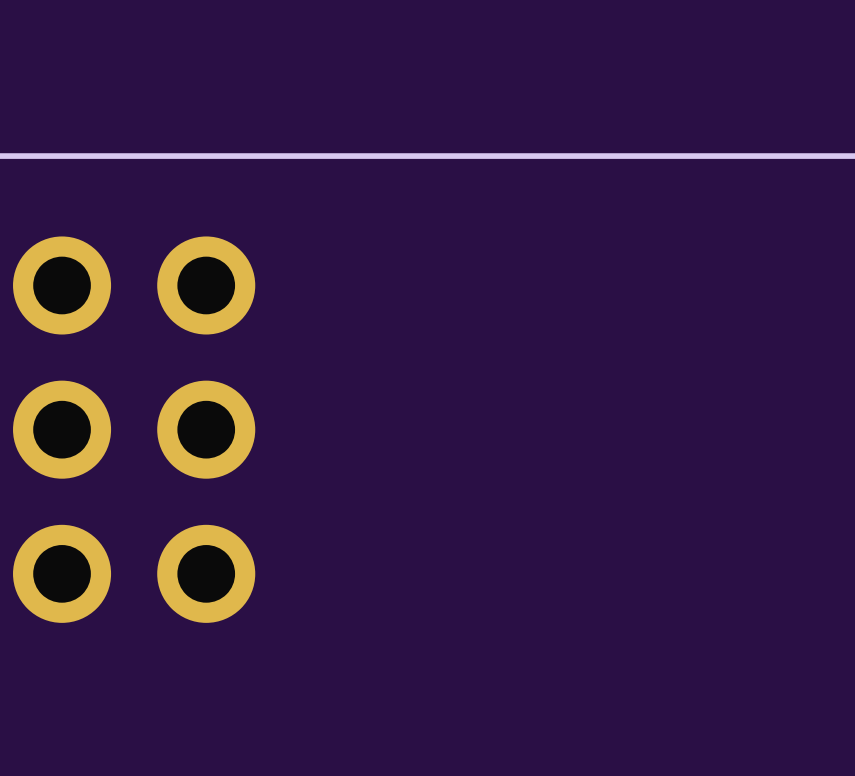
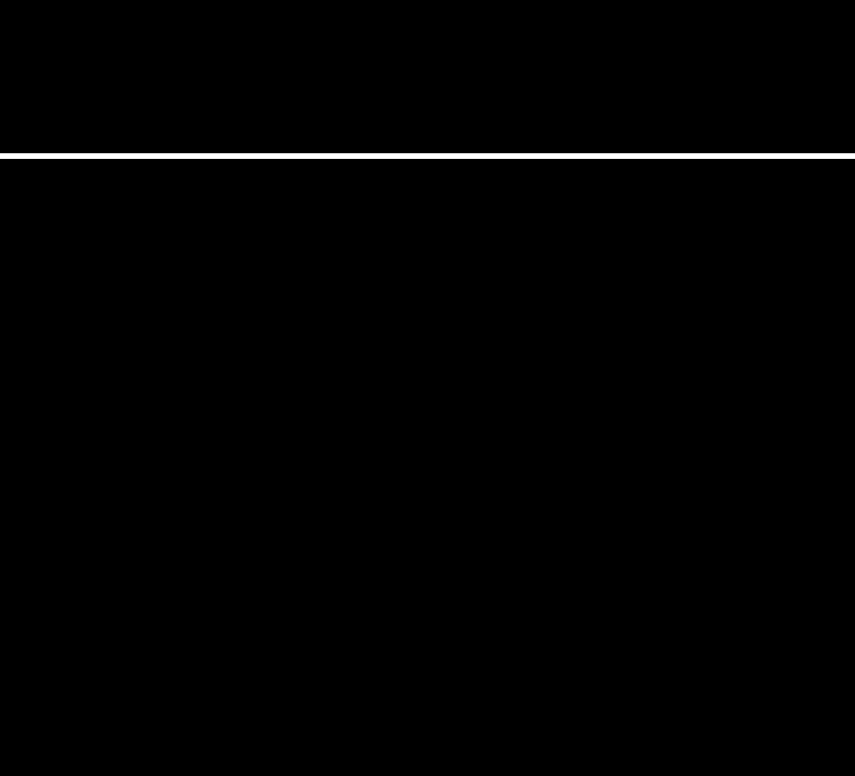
part: (134, 285) -> none
part: (134, 429) -> none
part: (134, 573) -> none

